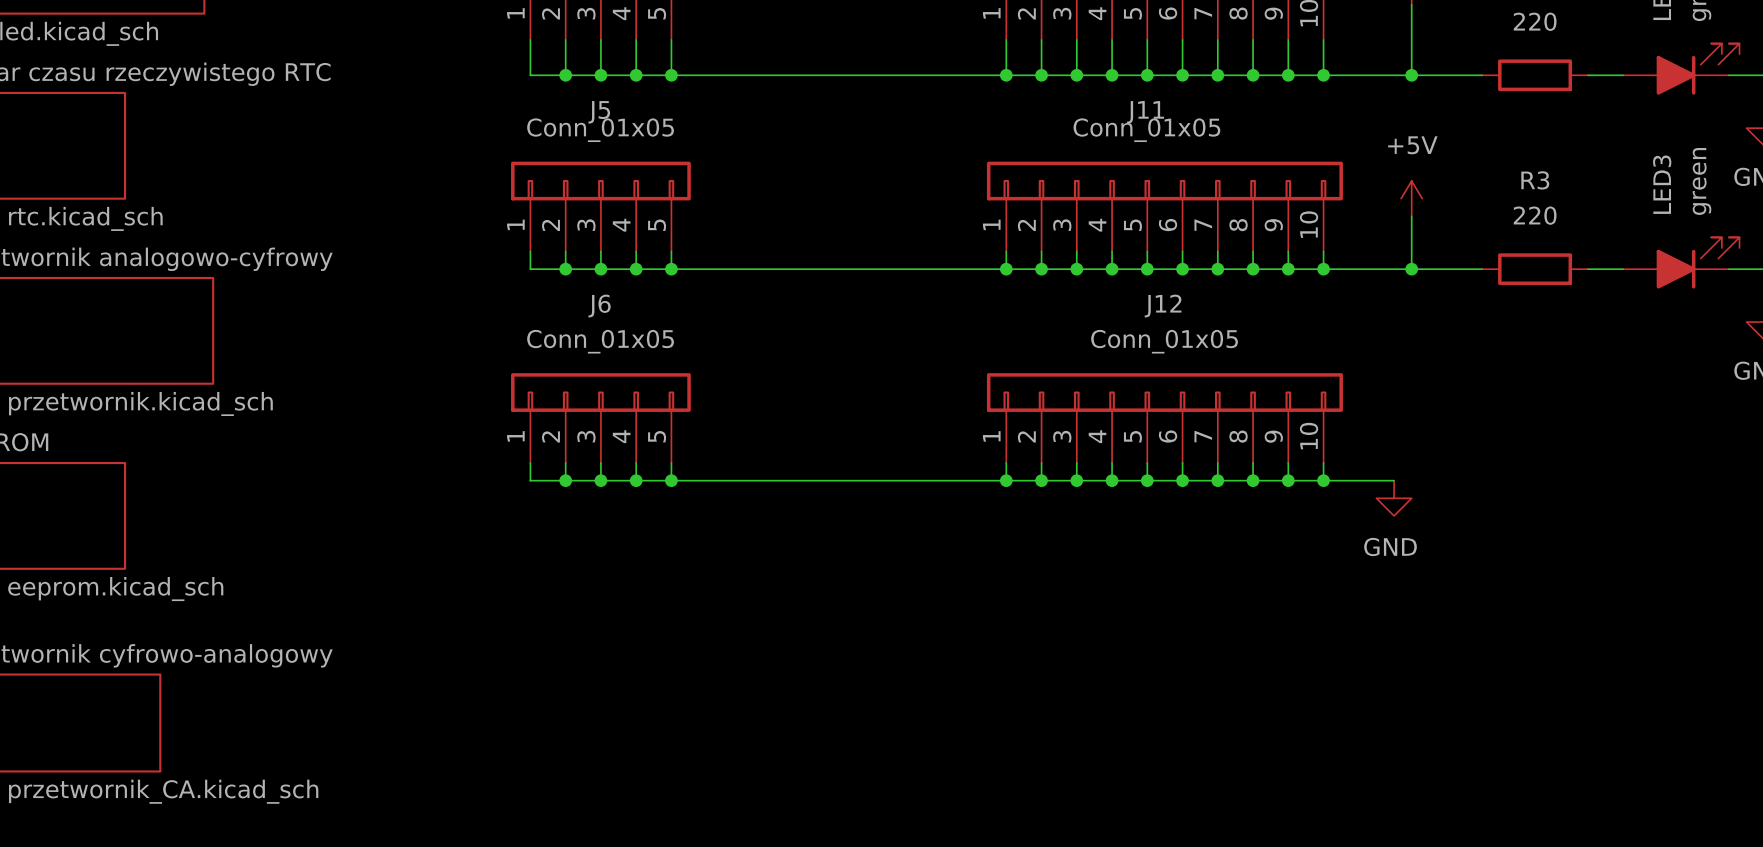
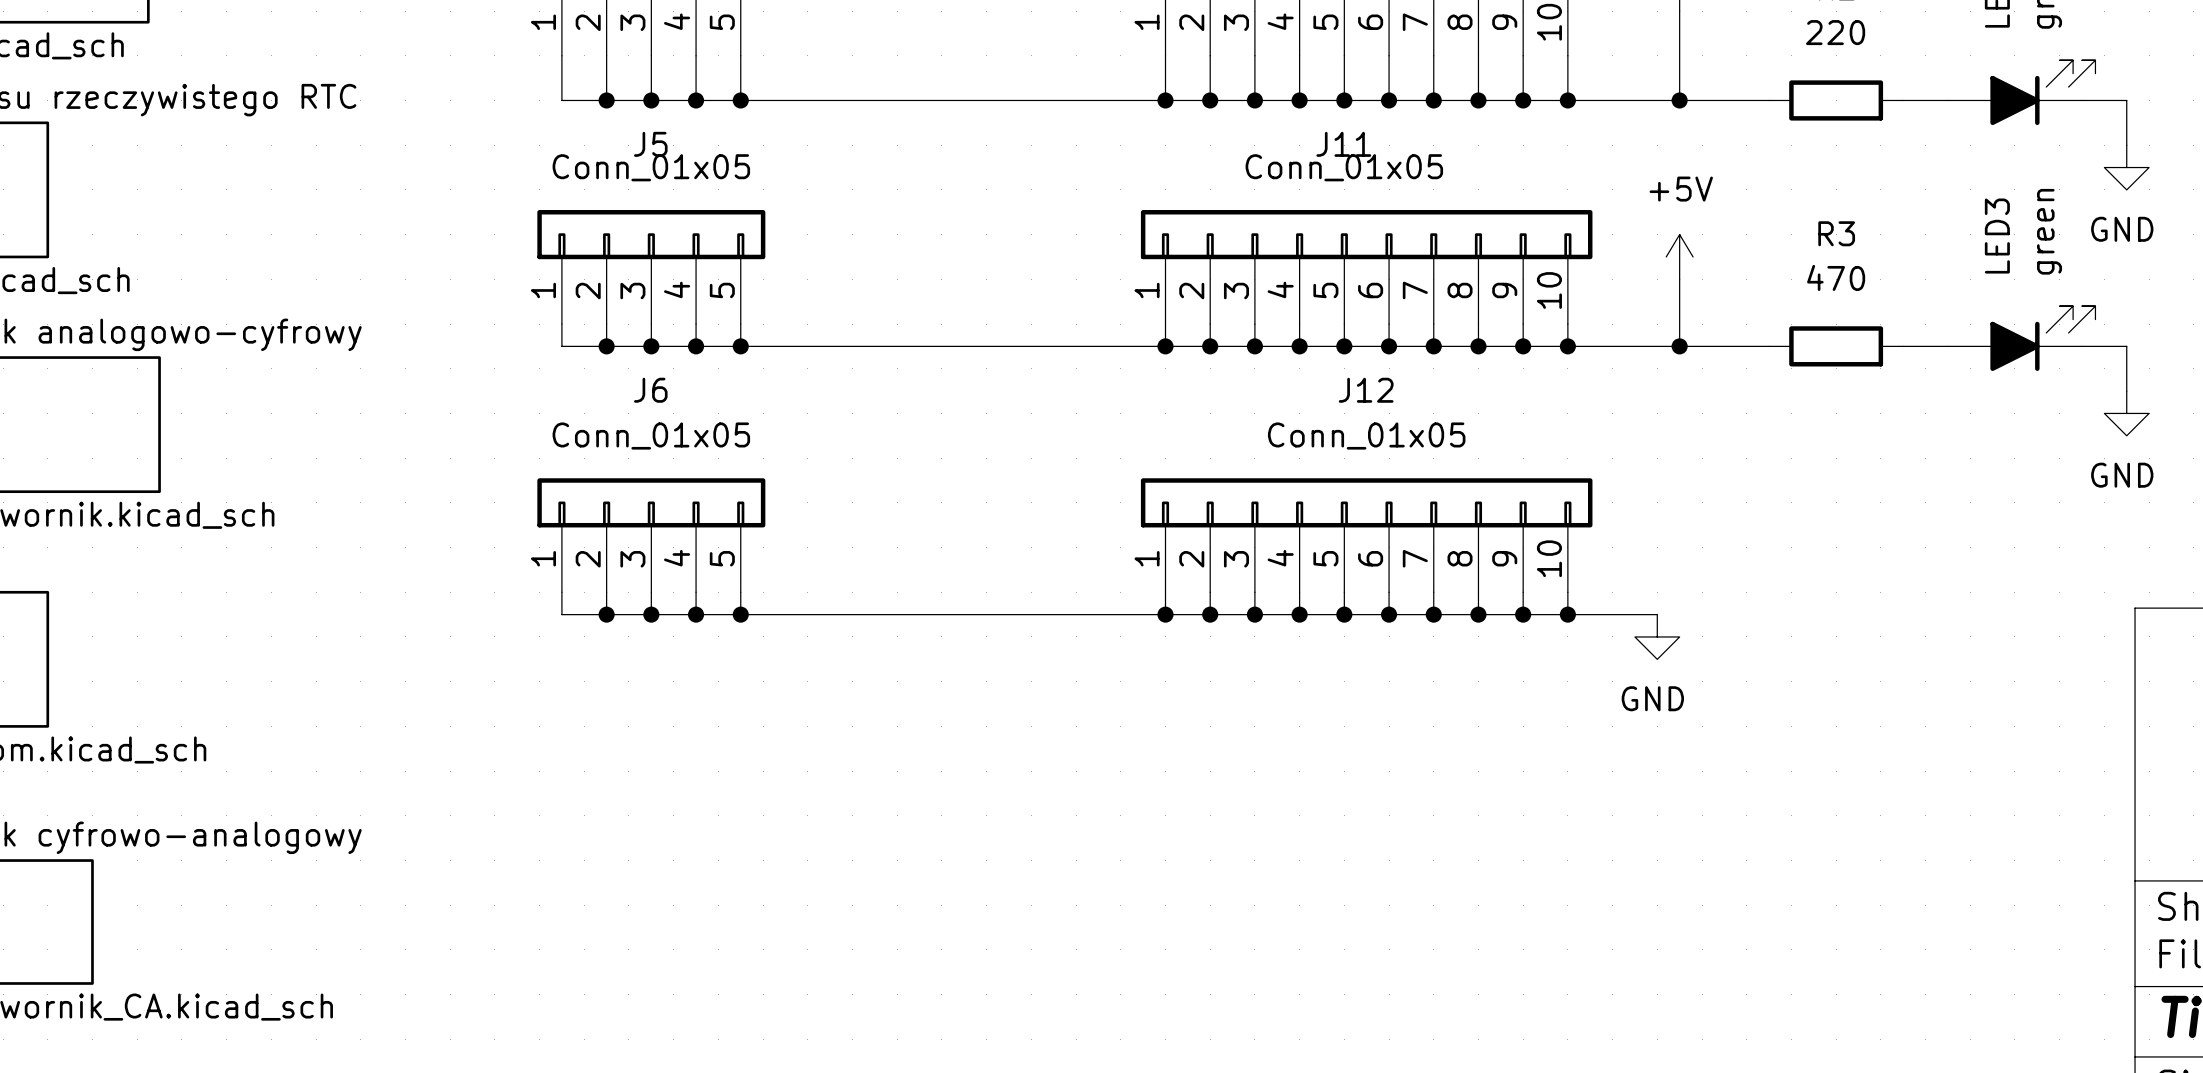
R3 value: 220 (1535, 215) -> 470 (1836, 277)

